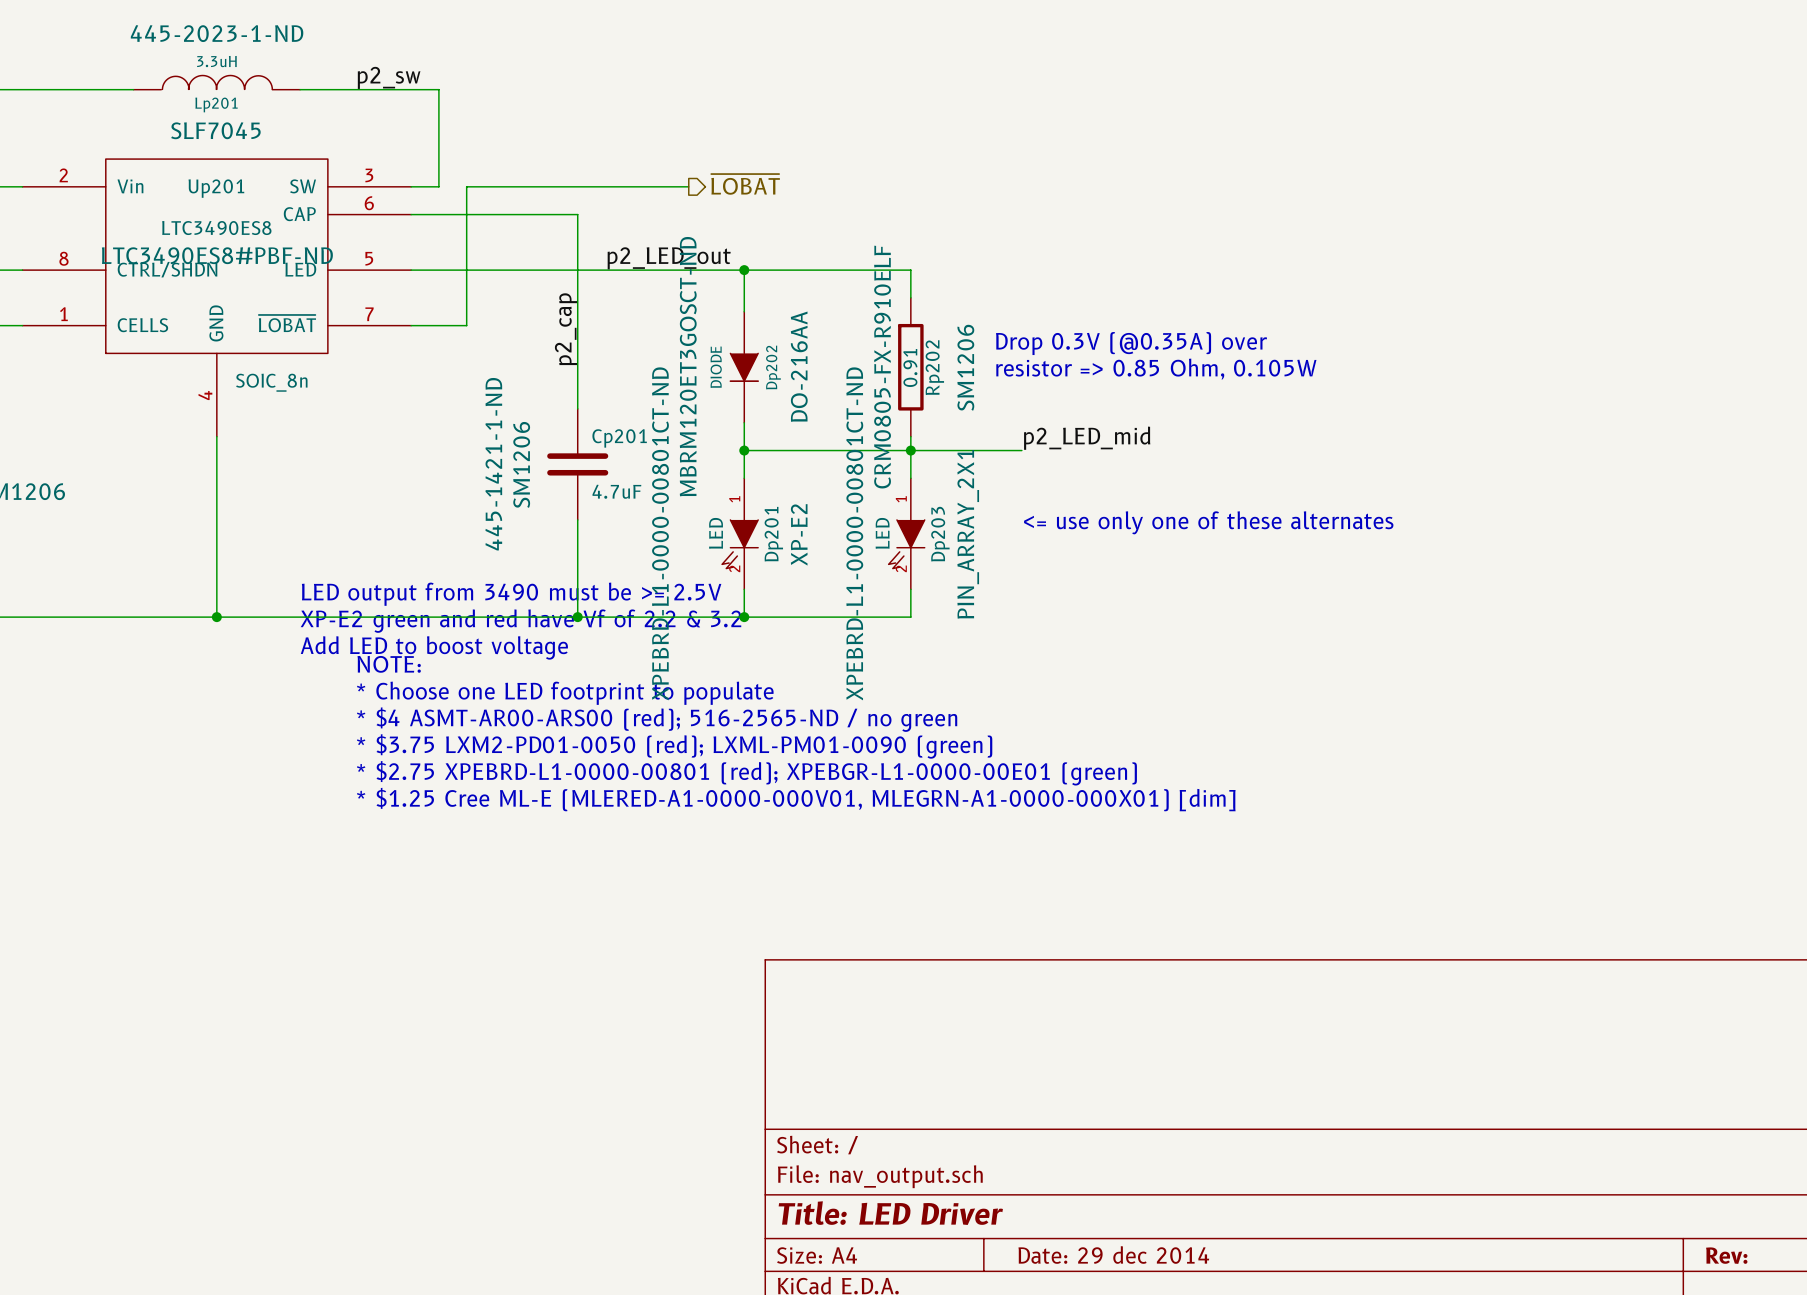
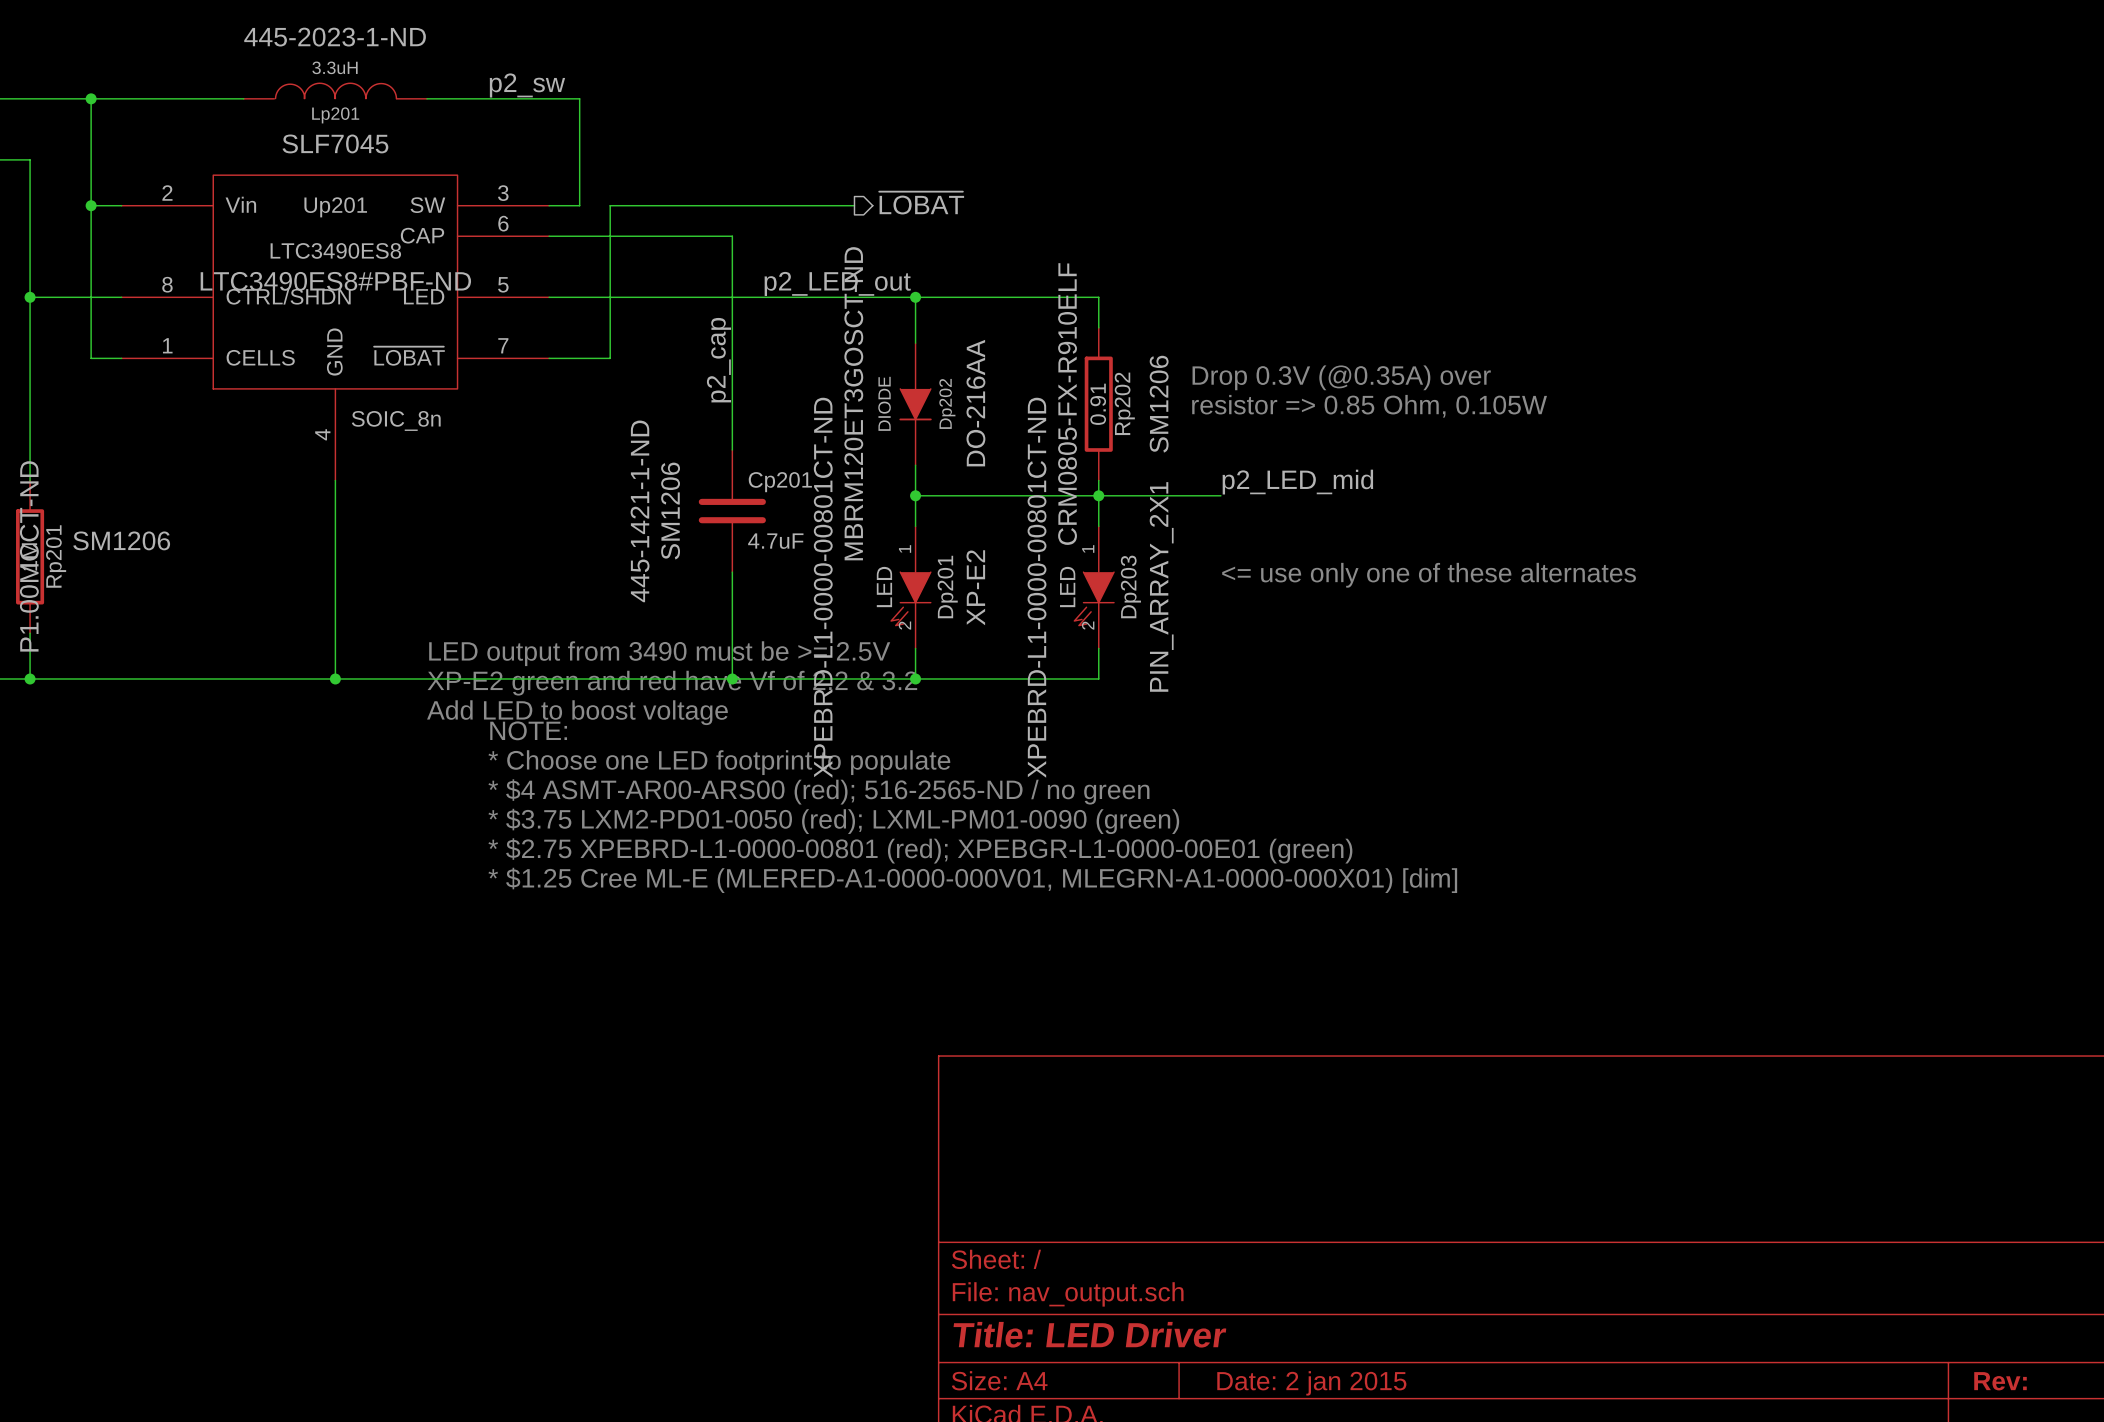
title block: Date: 29 dec 2014 (1113, 1254) -> Date: 2 jan 2015 (1311, 1383)

